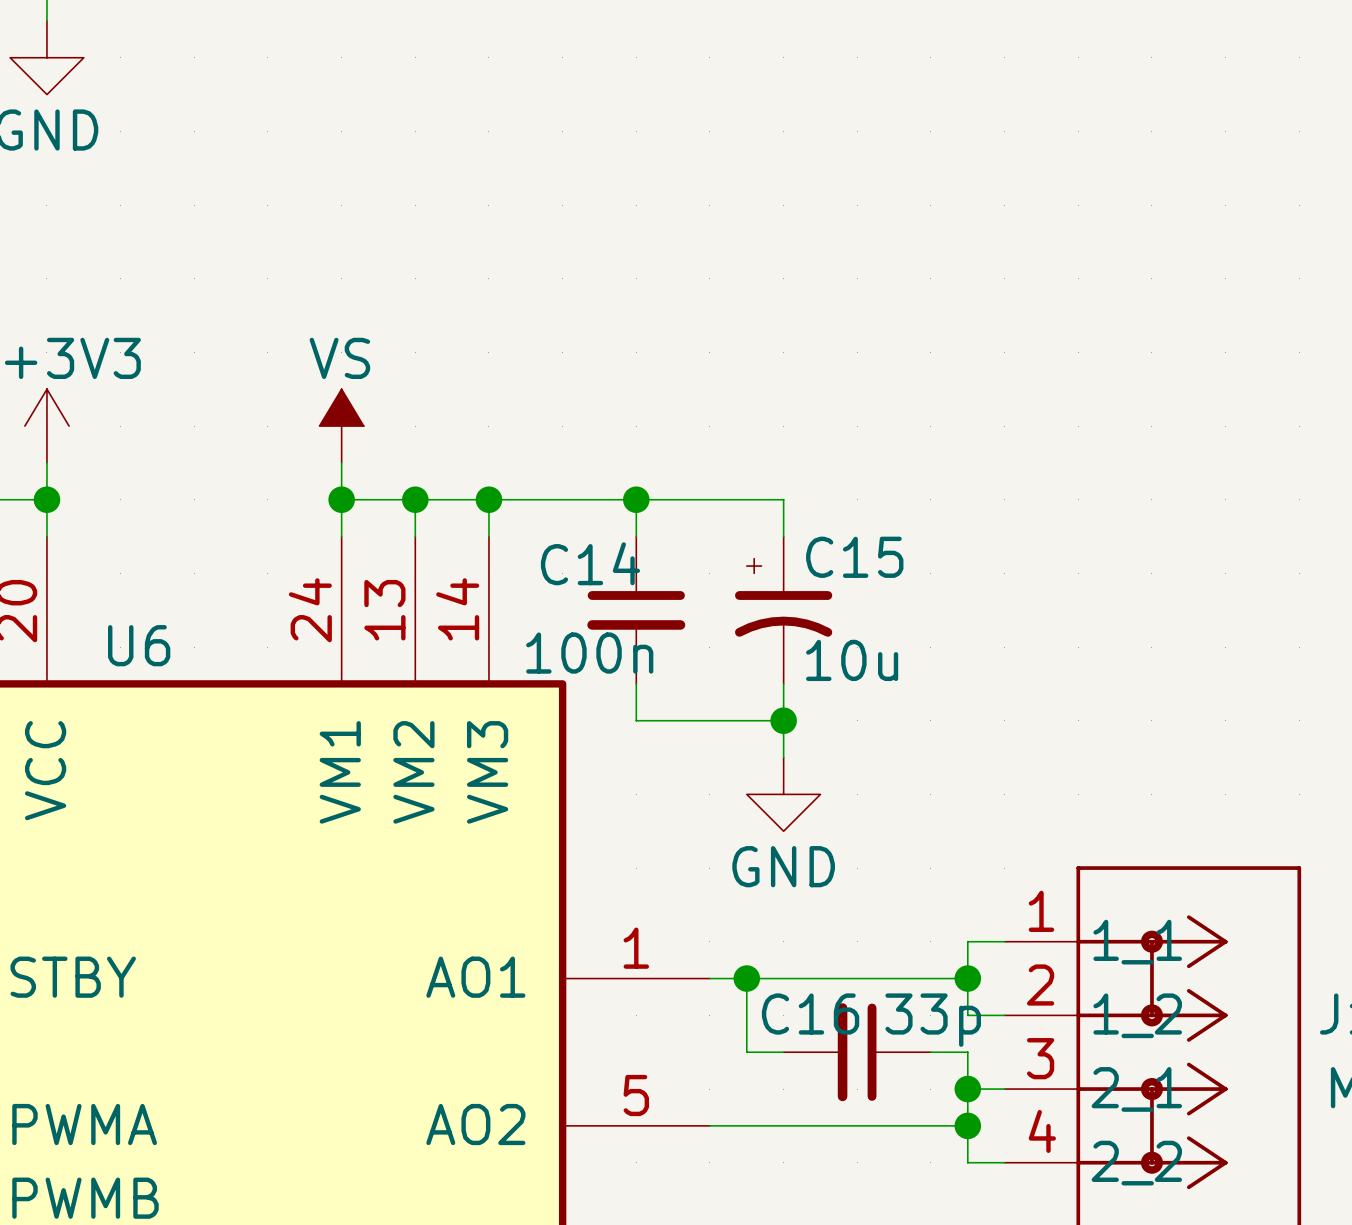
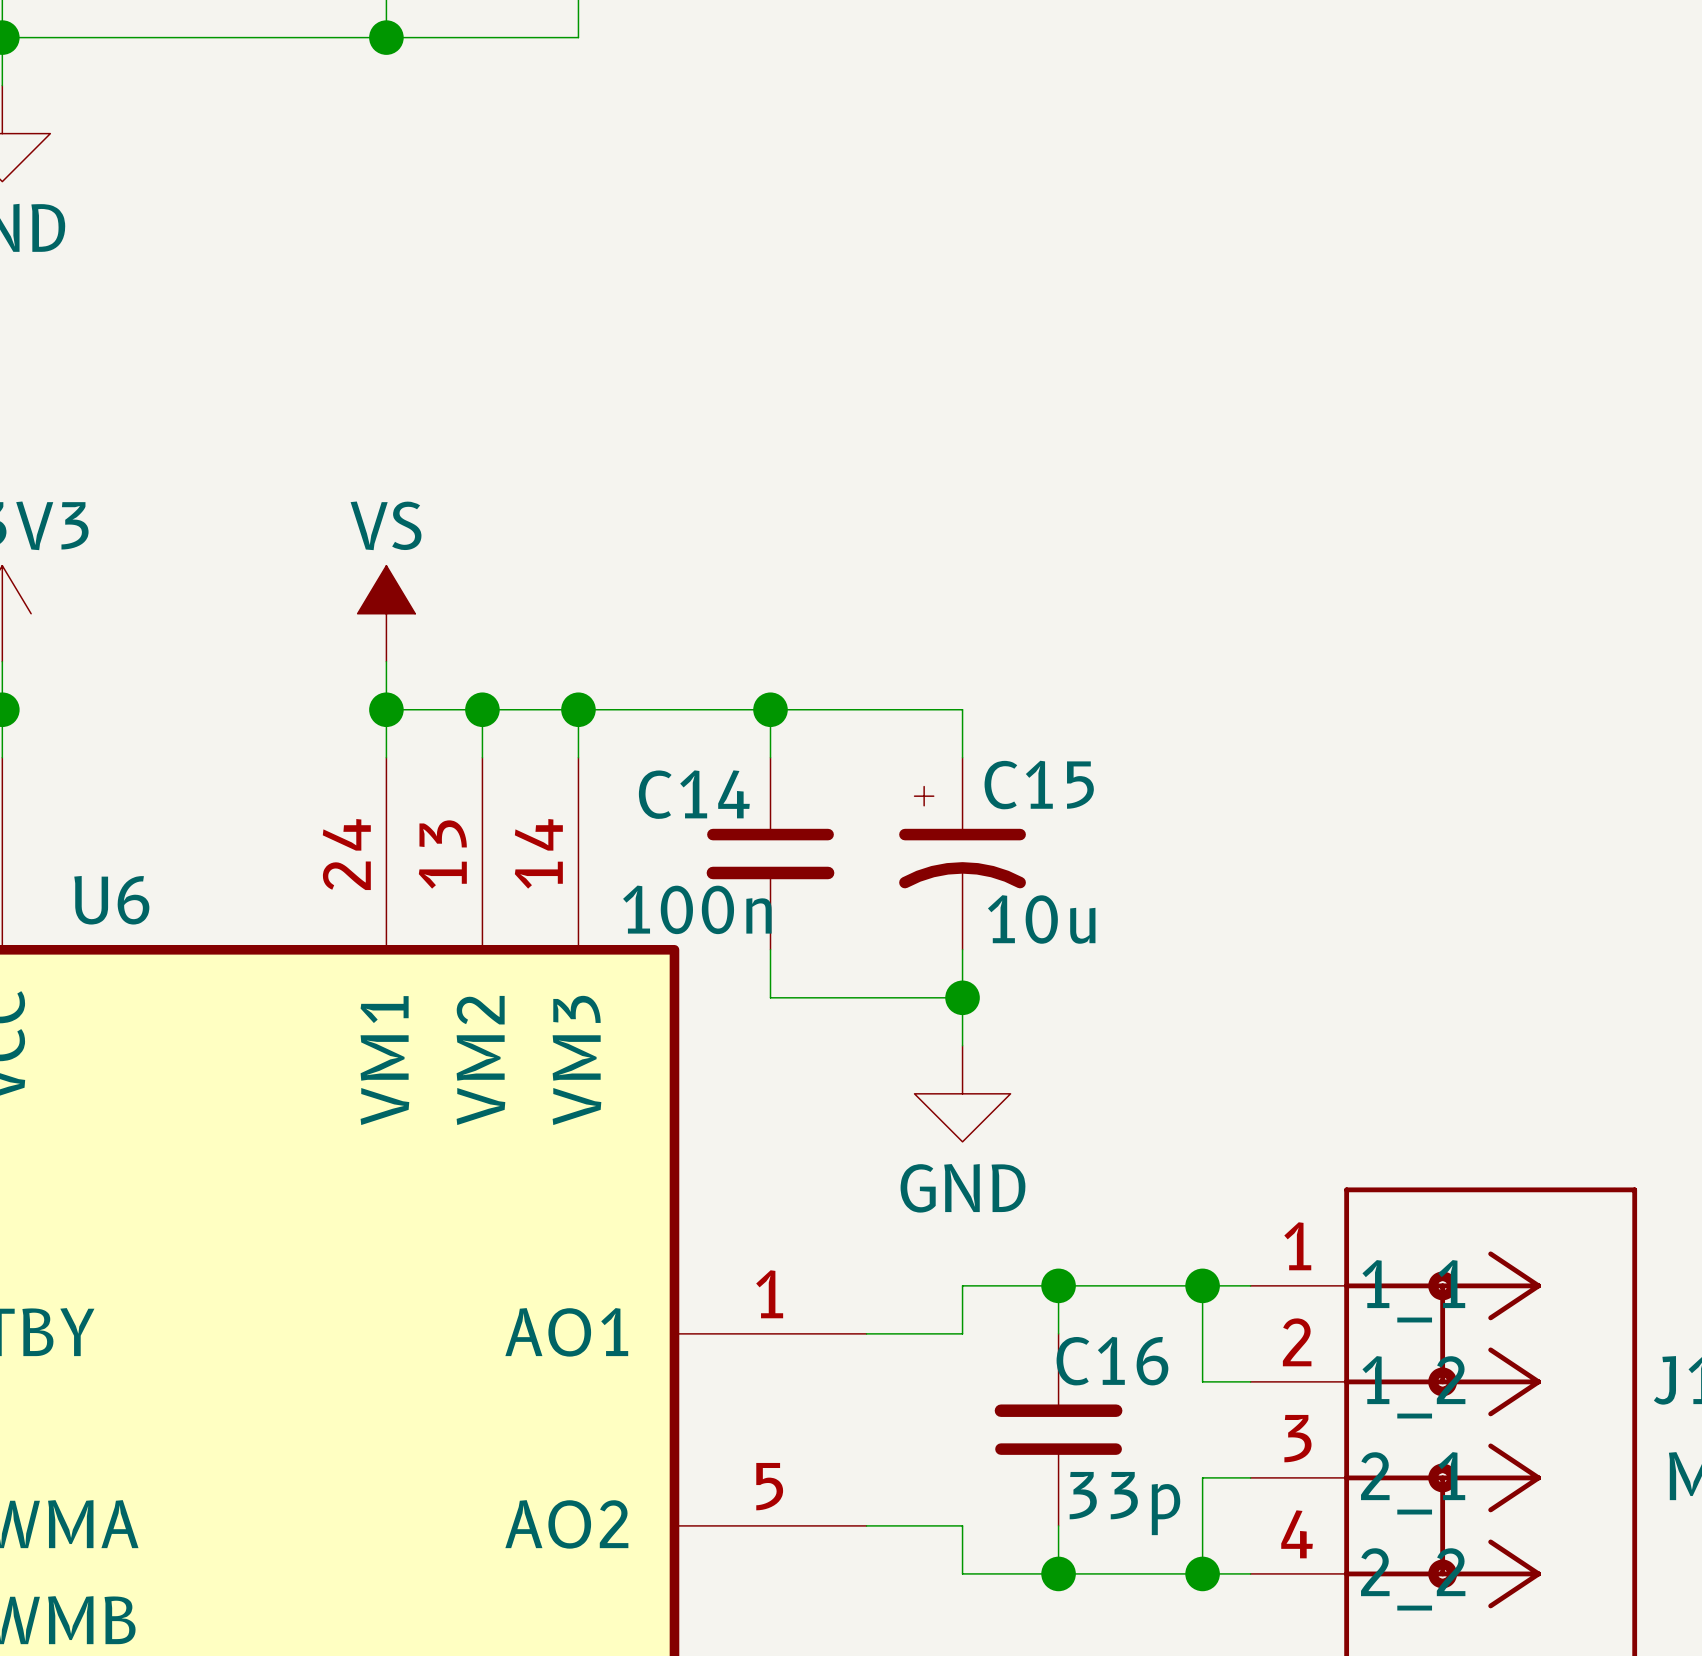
wire: none -> (1058, 1285) (1058, 1333)
junction: none -> (1058, 1285)
wire: (746, 978) (746, 1052) (783, 1052) -> none
junction: (746, 978) -> none
wire: (783, 978) (967, 978) -> (962, 1333) (962, 1285) (1202, 1285)
junction position: (967, 978) -> (1202, 1285)
C16 rotation: 0° (857, 1052) -> 90° clockwise (1058, 1429)
wire: (930, 1052) (967, 1052) (967, 1089) -> none
junction: (967, 1089) -> none
wire: (783, 1125) (967, 1125) -> (962, 1525) (962, 1573) (1202, 1573)
wire: none -> (1058, 1525) (1058, 1573)
junction: (967, 1125) -> none
junction: none -> (1058, 1573)
junction: none -> (1202, 1573)

